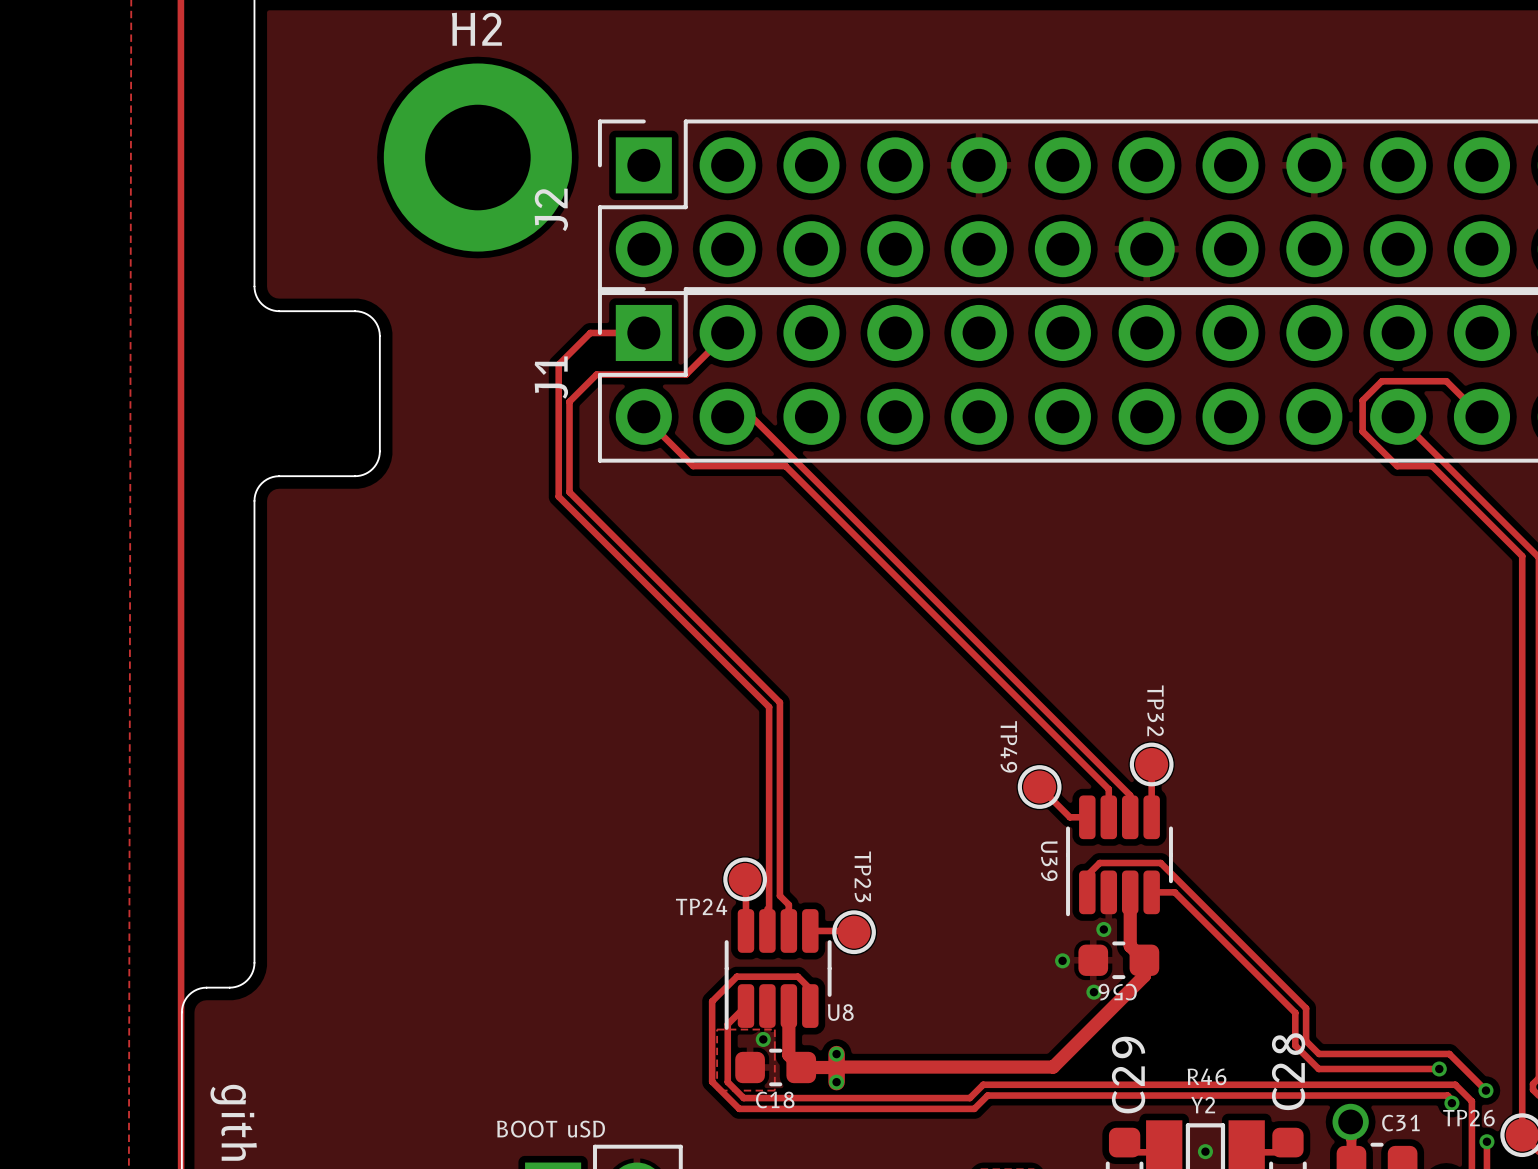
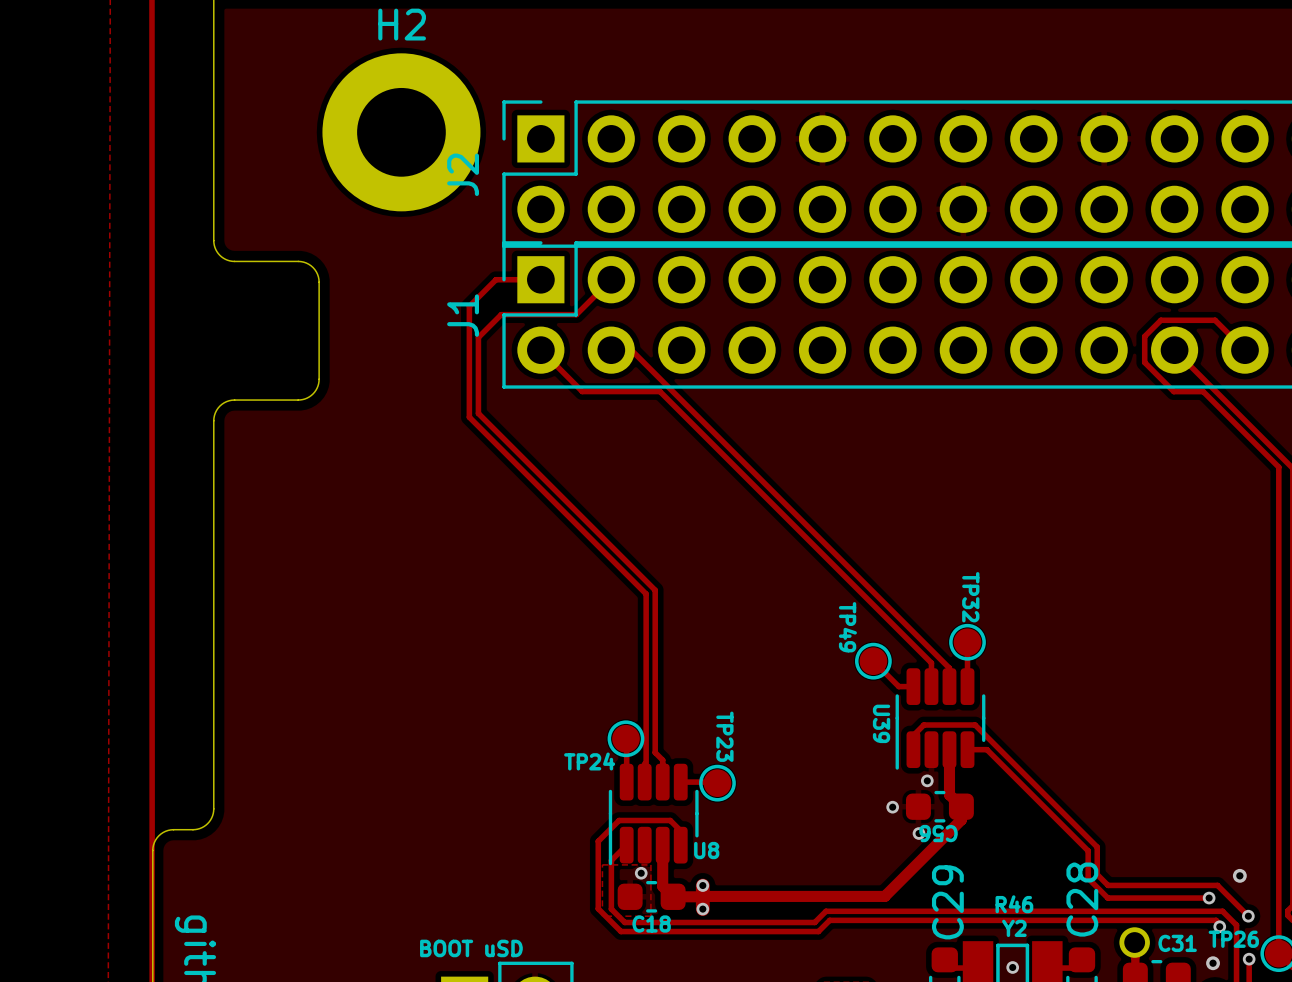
via: none -> (1239, 875)
via: none -> (1213, 963)

